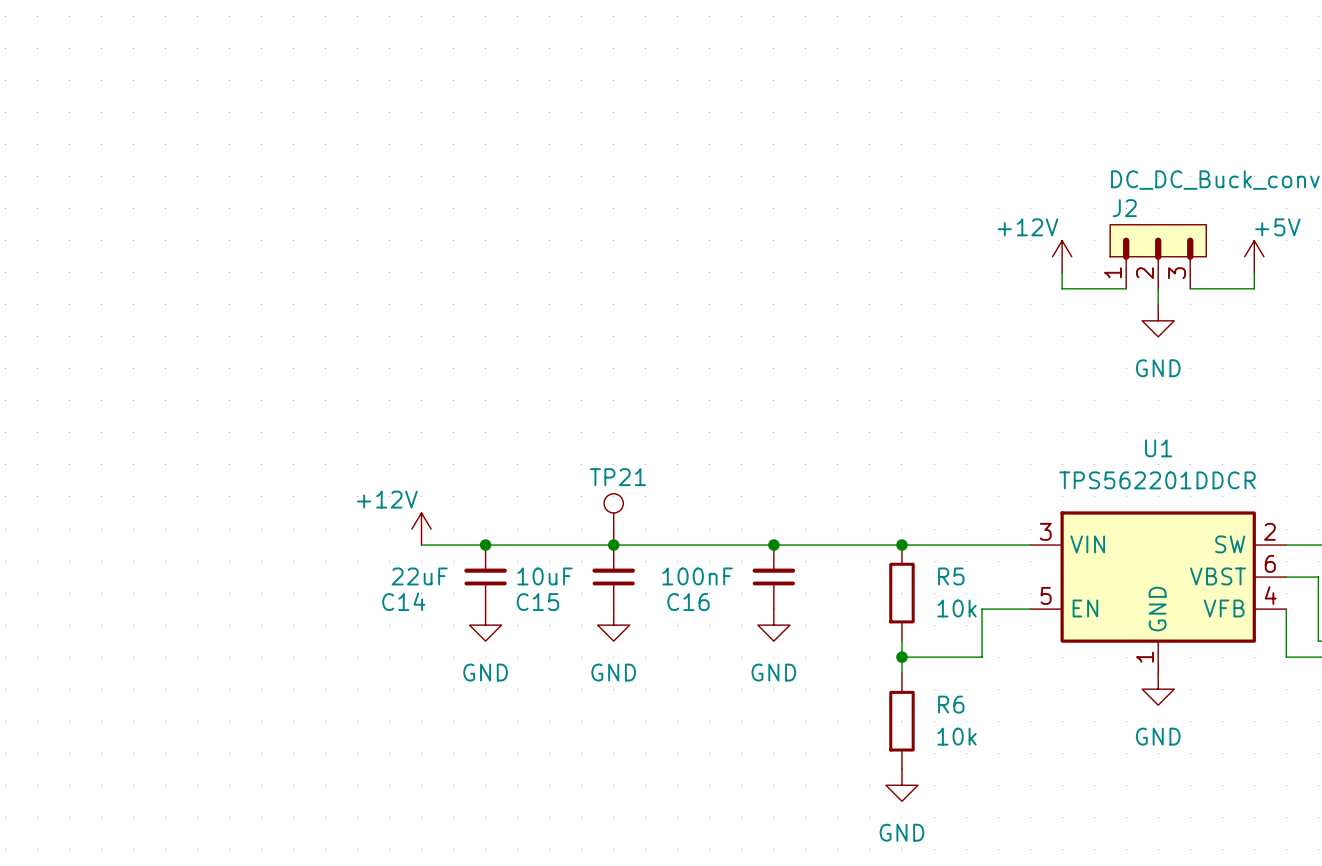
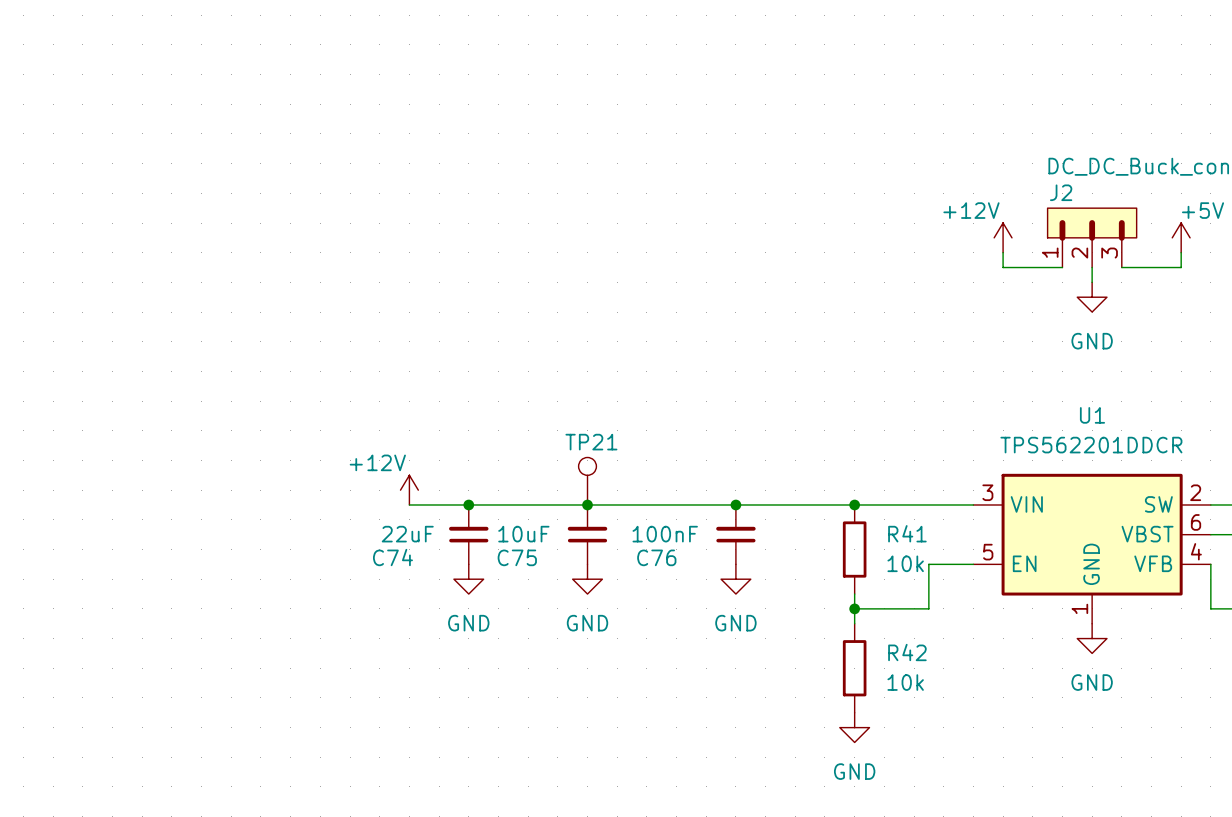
R5 name: R5 (951, 576) -> R41 (907, 533)
C14 name: C14 (403, 601) -> C74 (392, 557)
C15 name: C15 (537, 602) -> C75 (517, 557)
C16 name: C16 (688, 602) -> C76 (656, 557)
R6 name: R6 (951, 704) -> R42 (907, 652)

